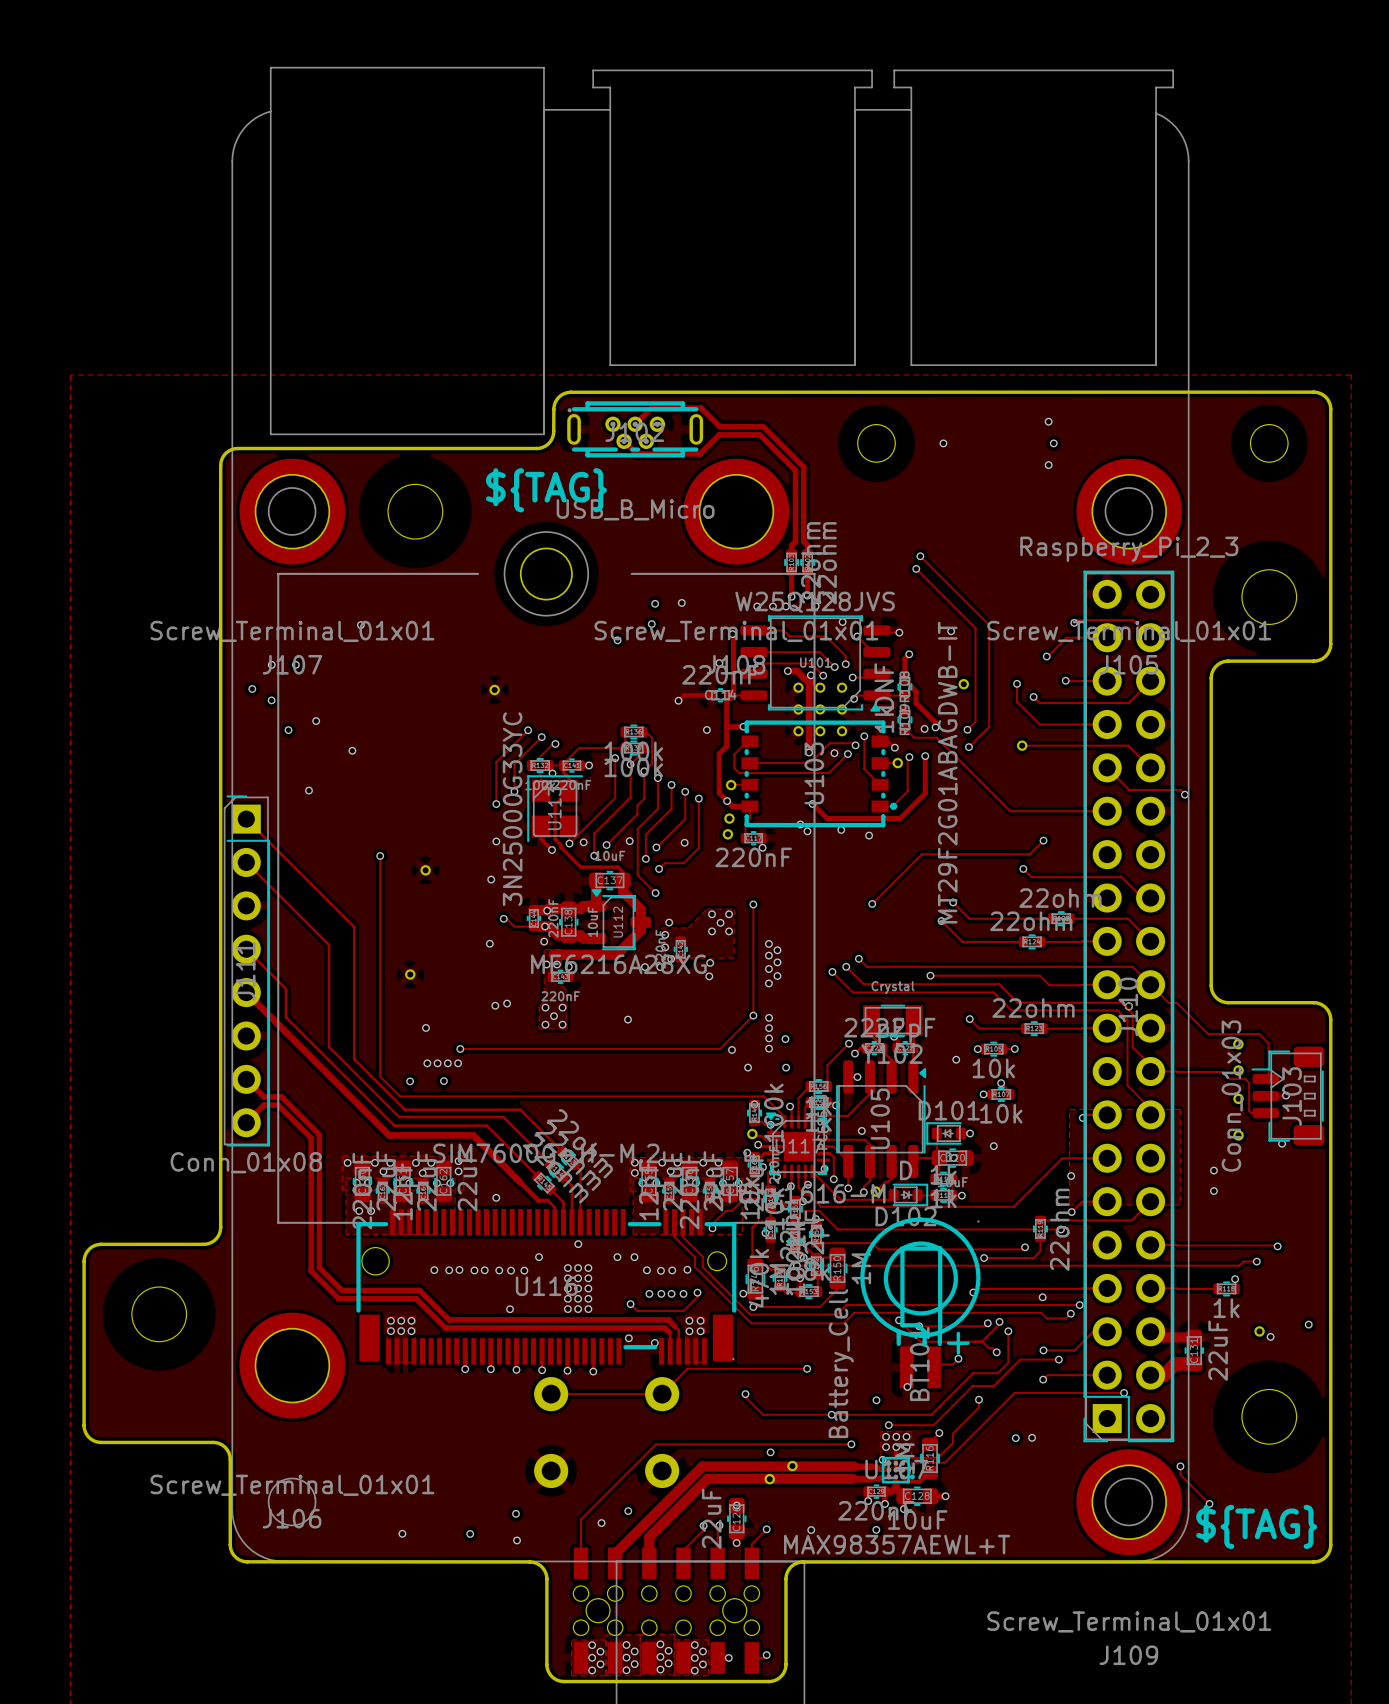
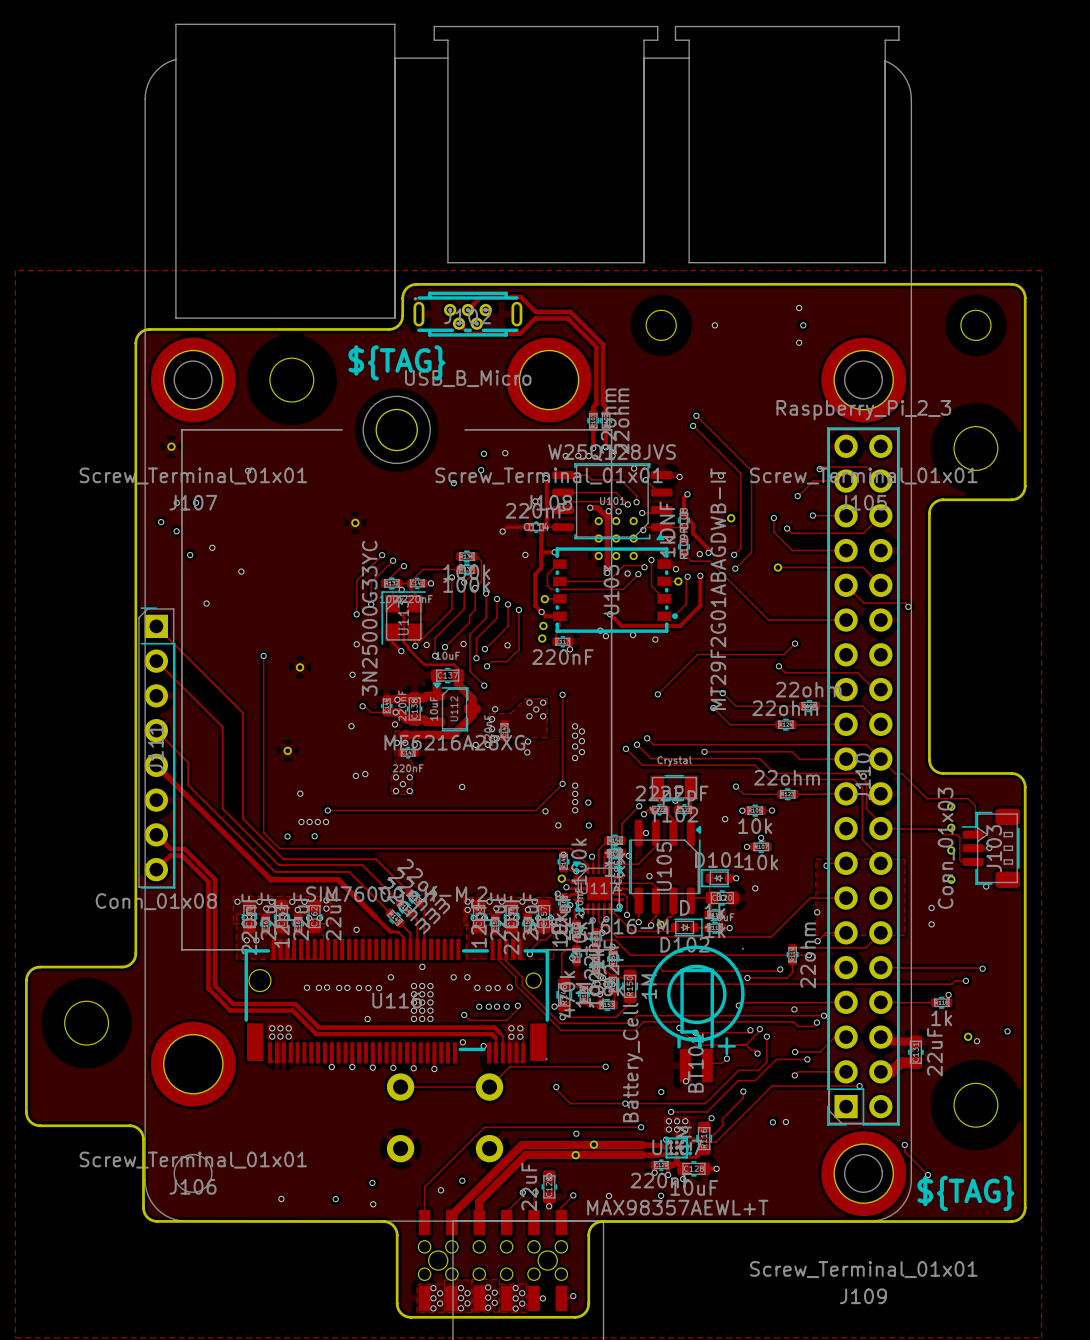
part: none -> (171, 446)

